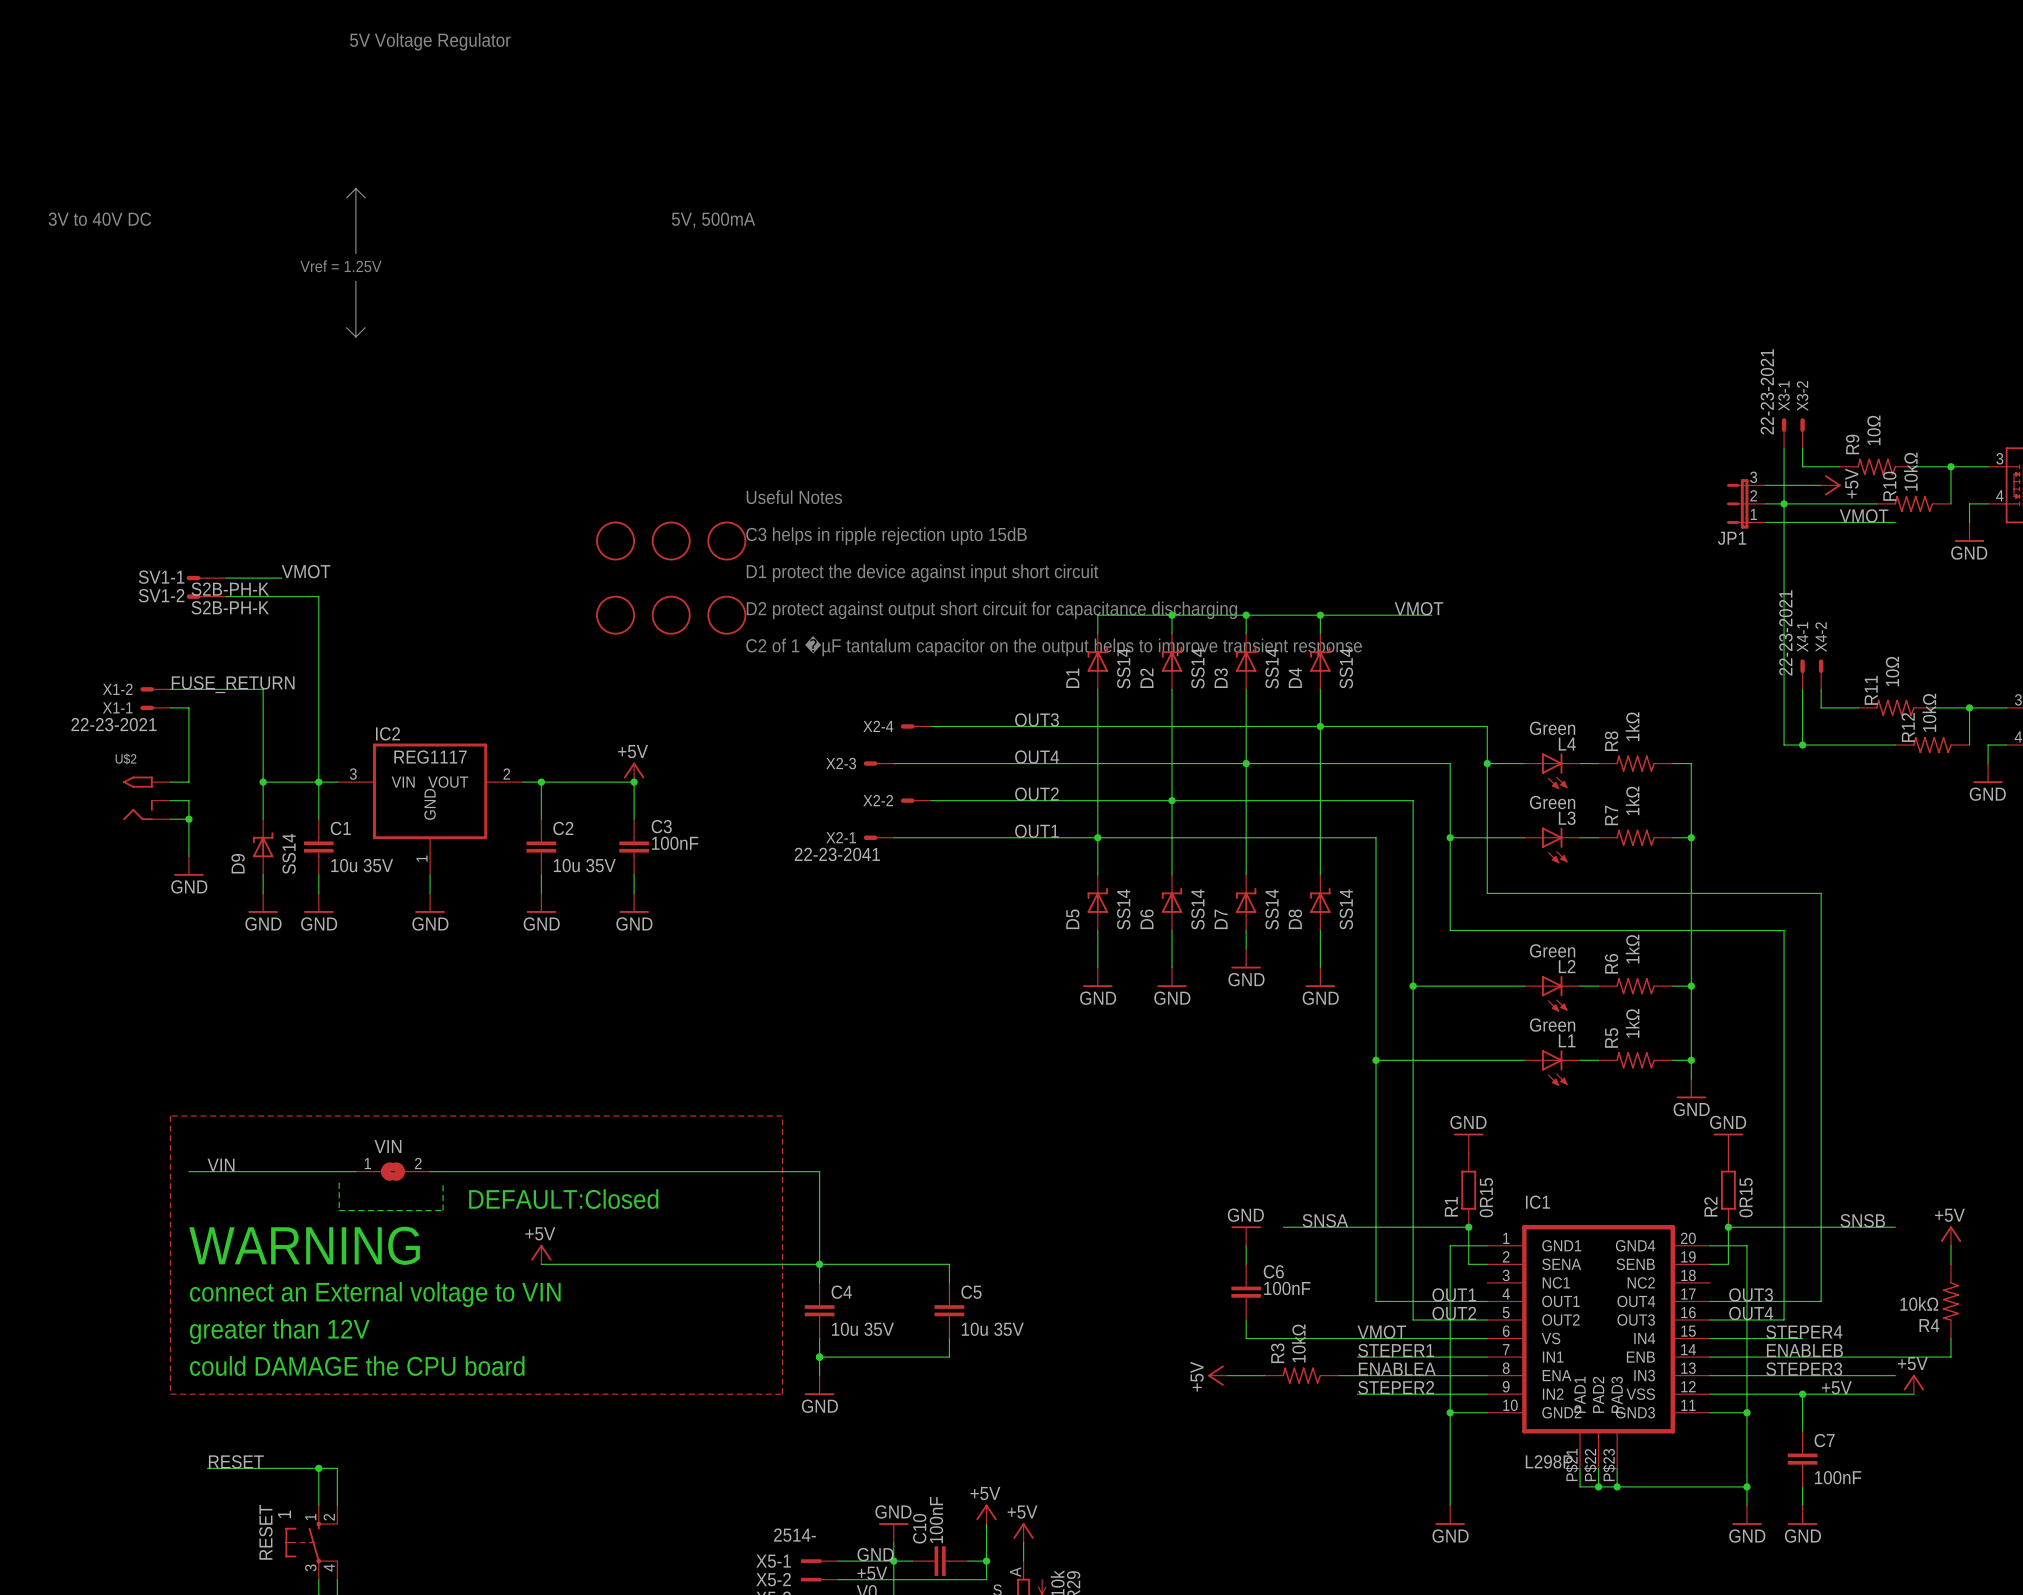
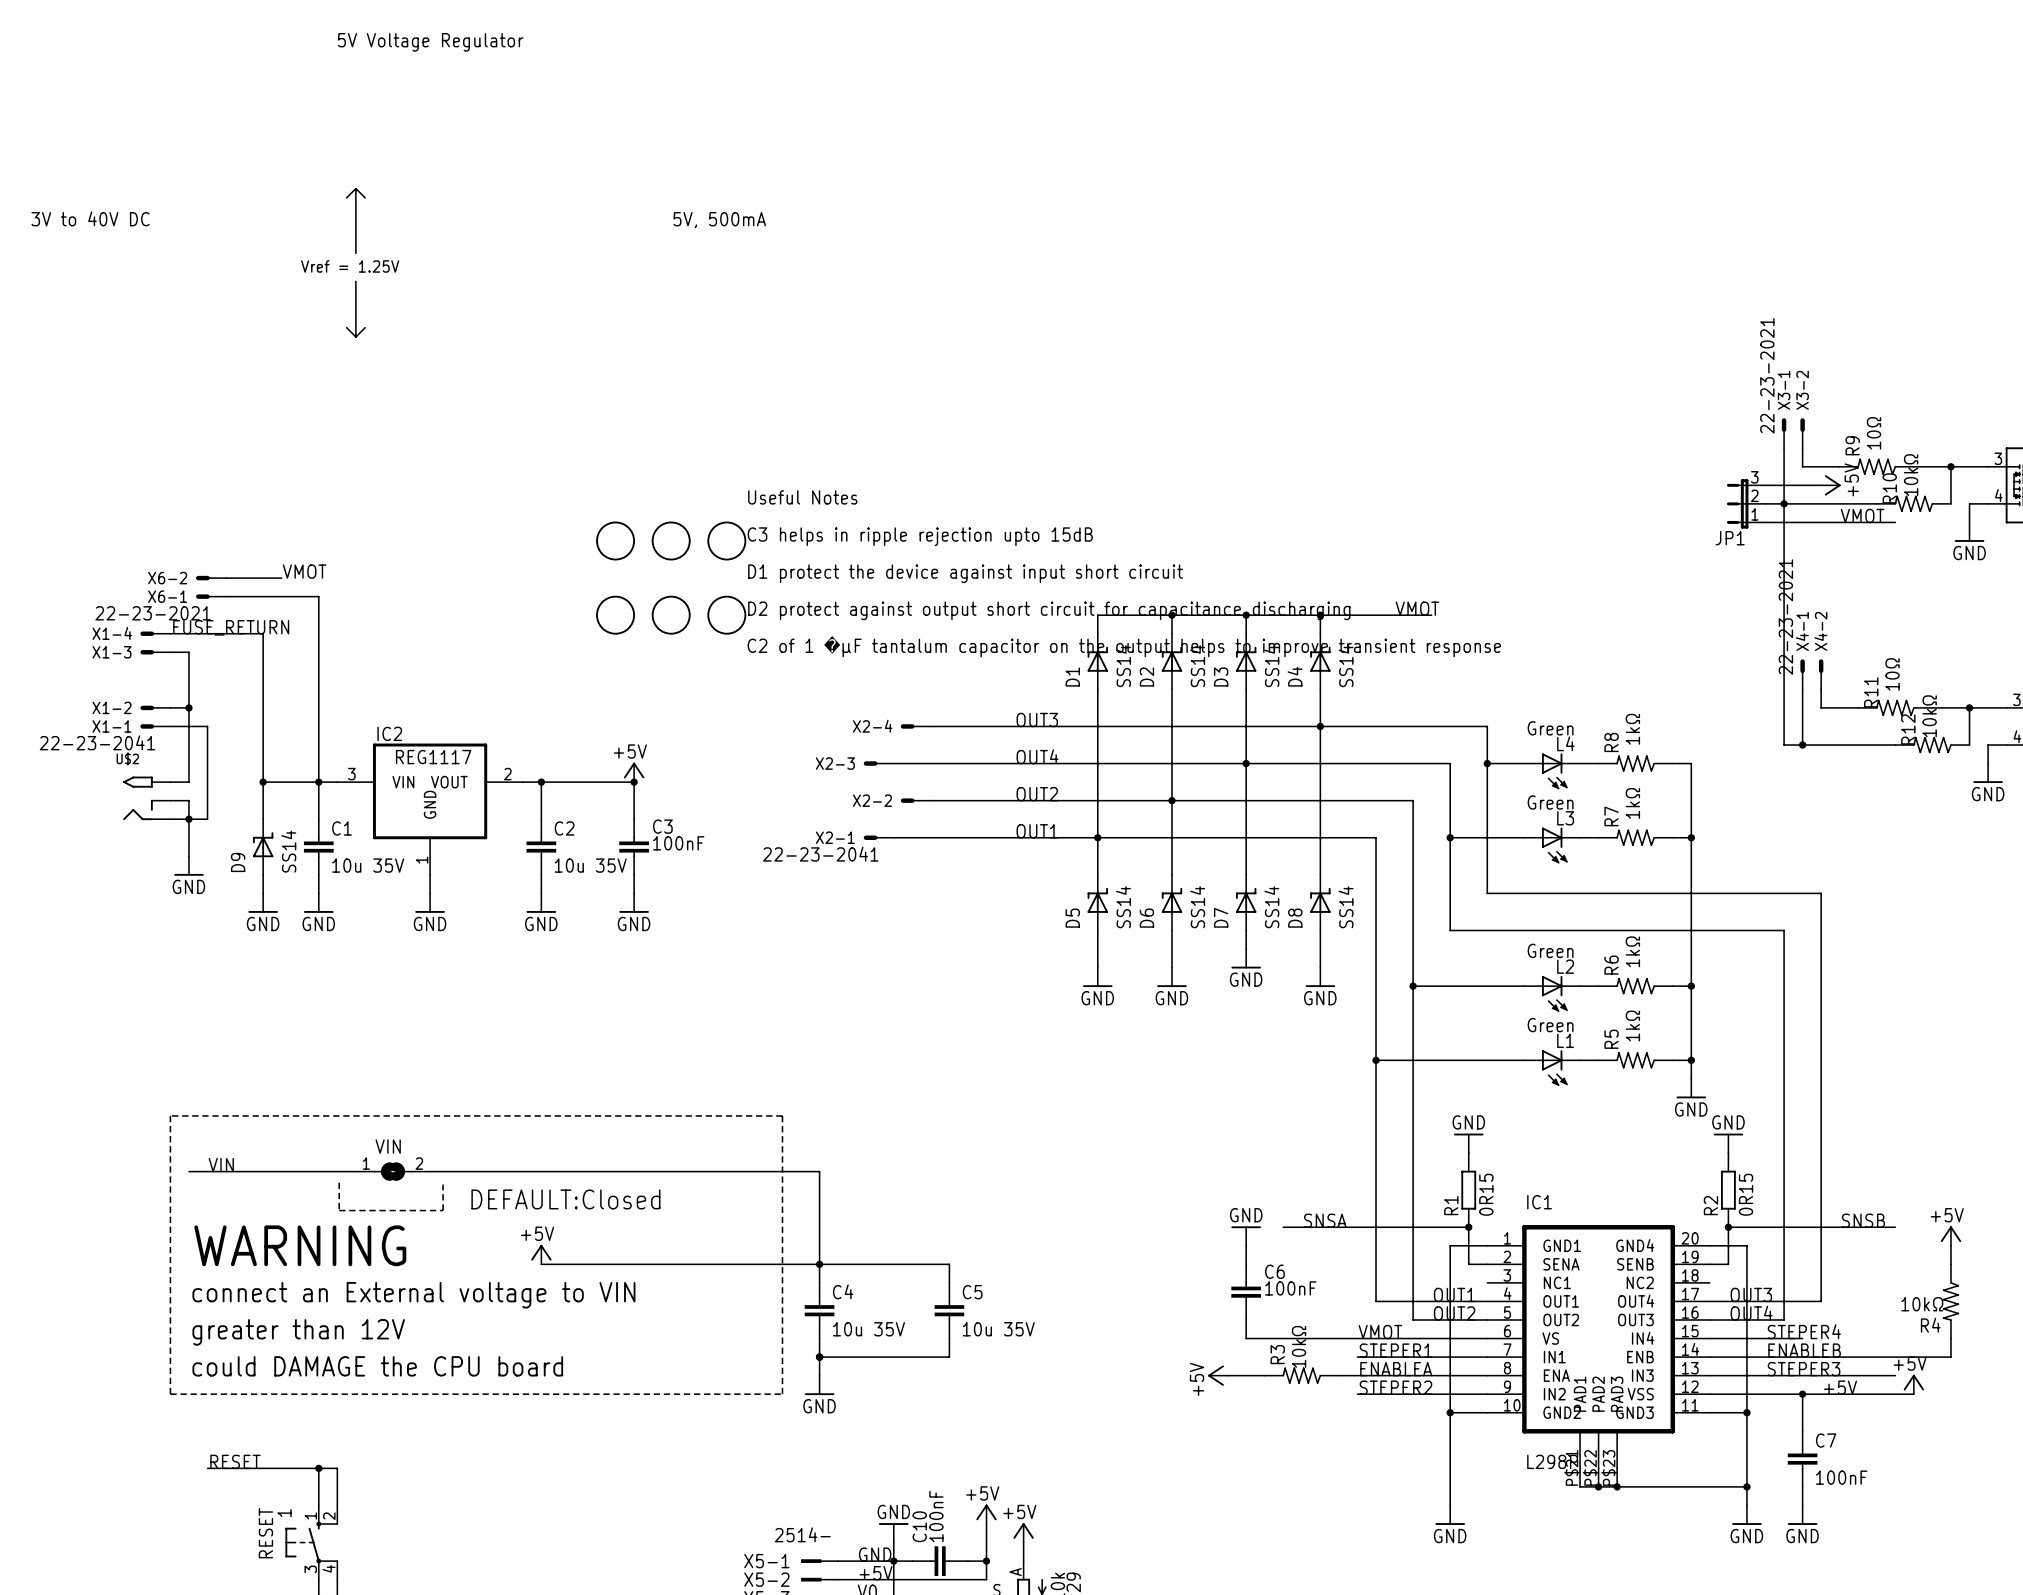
SV1-1: S2B-PH-K (206, 578) -> none
X6-2: none -> (211, 578)
SV1-2: S2B-PH-K (206, 596) -> none
X6-1: none -> 22-23-2021 (211, 596)
X1-4: none -> (155, 633)
X1-3: none -> (155, 652)
wire: none -> (170, 652) (188, 652) (188, 707)
label position: FUSE_RETURN (233, 684) -> FUSE_RETURN (231, 627)
X1-2: (155, 689) -> none
wire: (170, 689) (263, 689) -> (170, 633) (263, 633) (263, 689)
X1-1 name: X1-1 (117, 707) -> X1-2 (111, 707)
junction: none -> (188, 707)
X1-1 value: 22-23-2021 (114, 724) -> none
X1-1: none -> 22-23-2041 (155, 726)
wire: none -> (170, 726) (207, 726) (207, 819) (188, 819)

